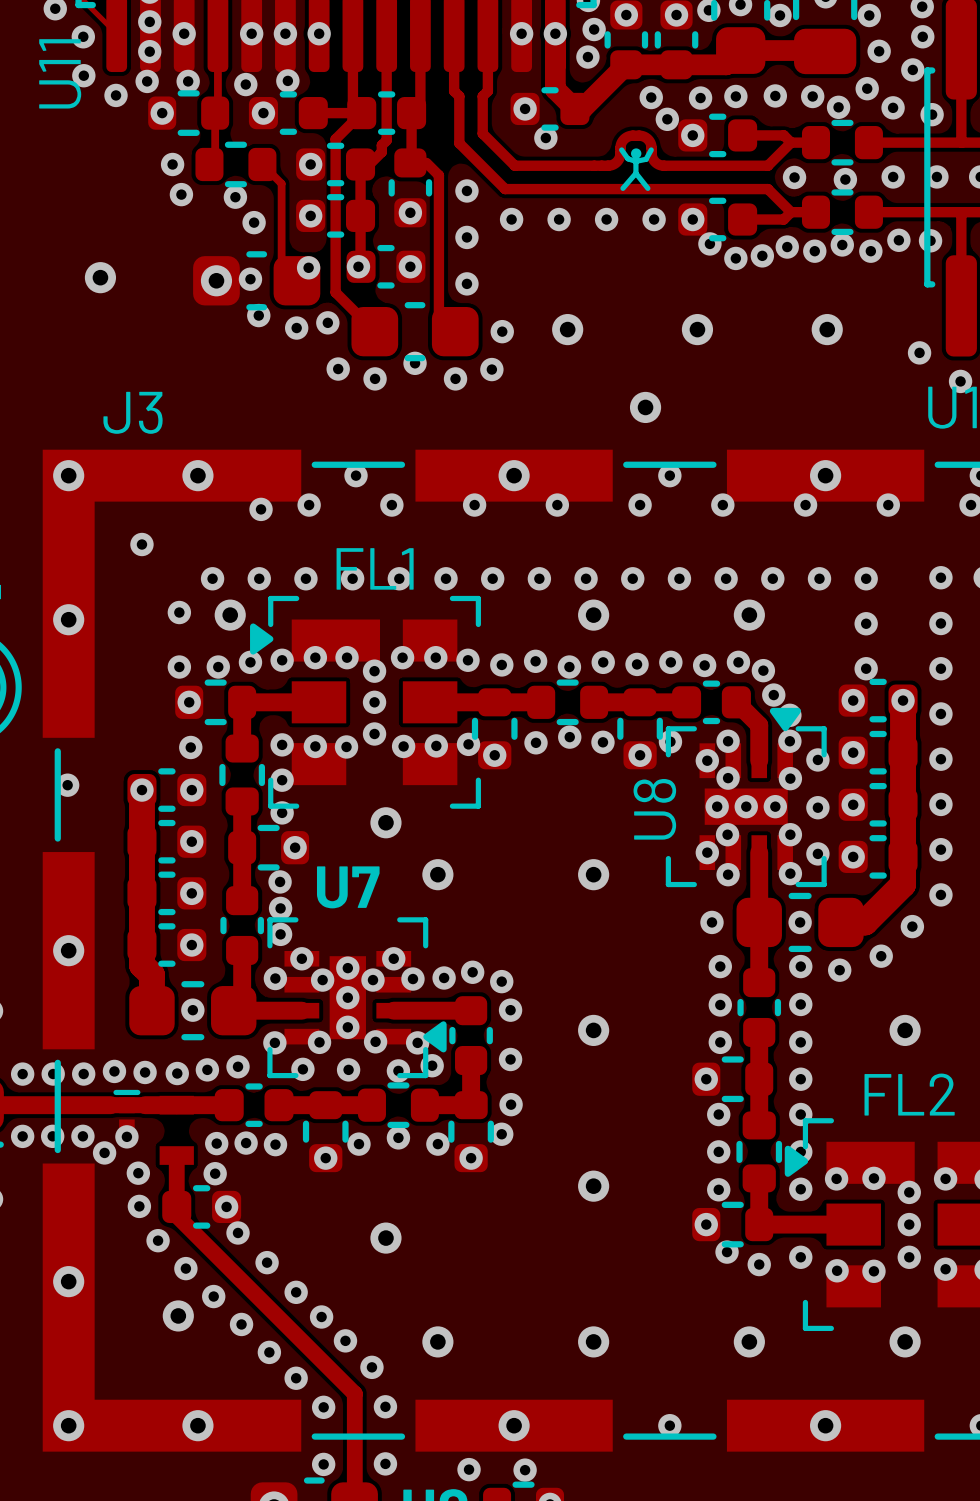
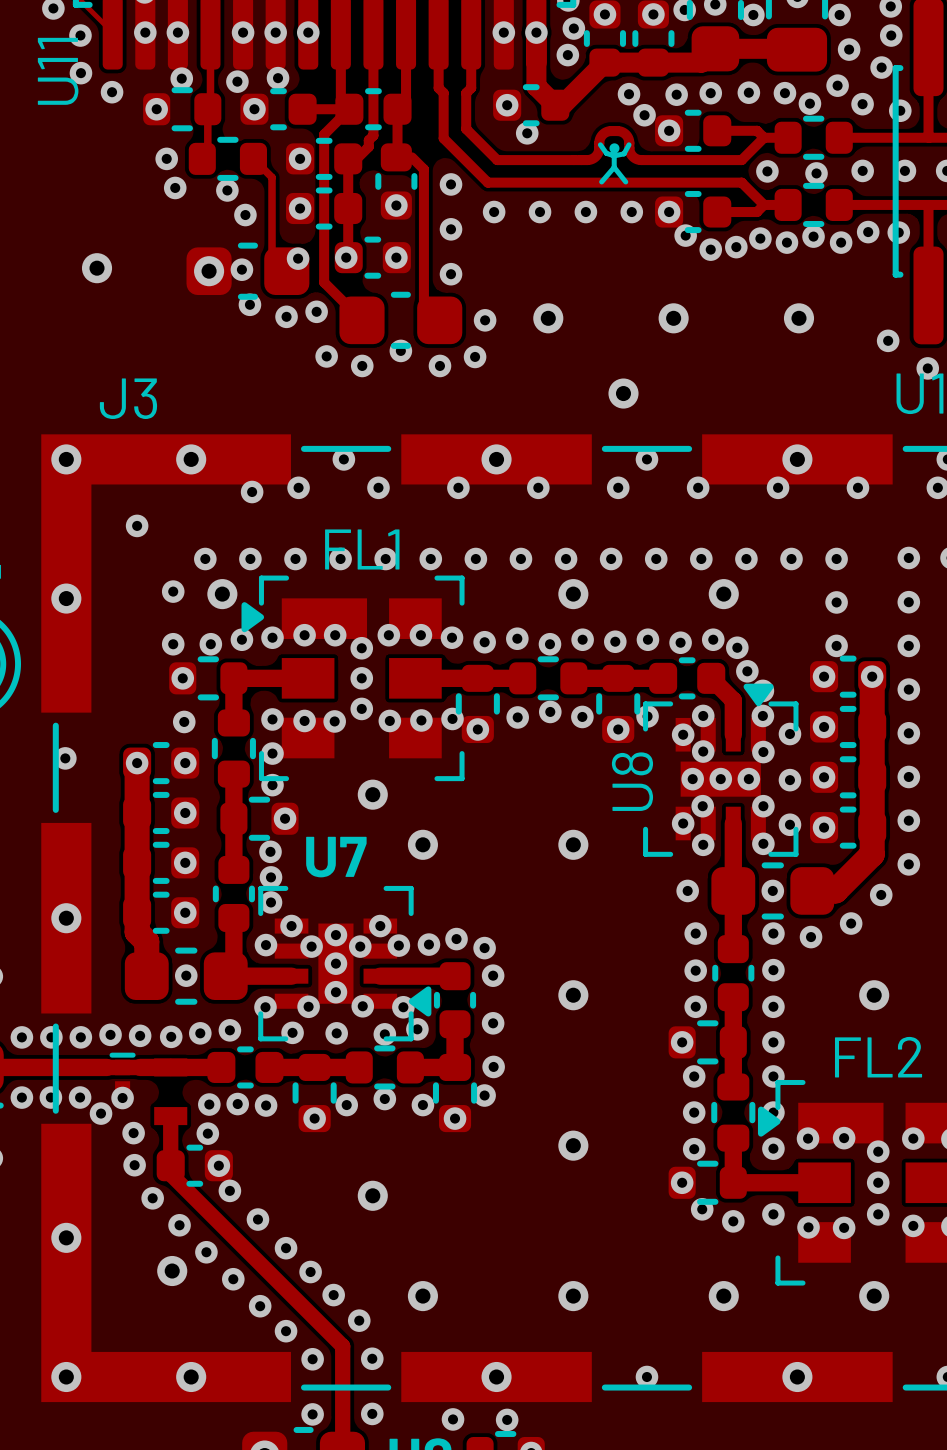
via: (149, 21) -> none
via: none -> (145, 32)
via: (149, 51) -> none
via: (147, 81) -> none

